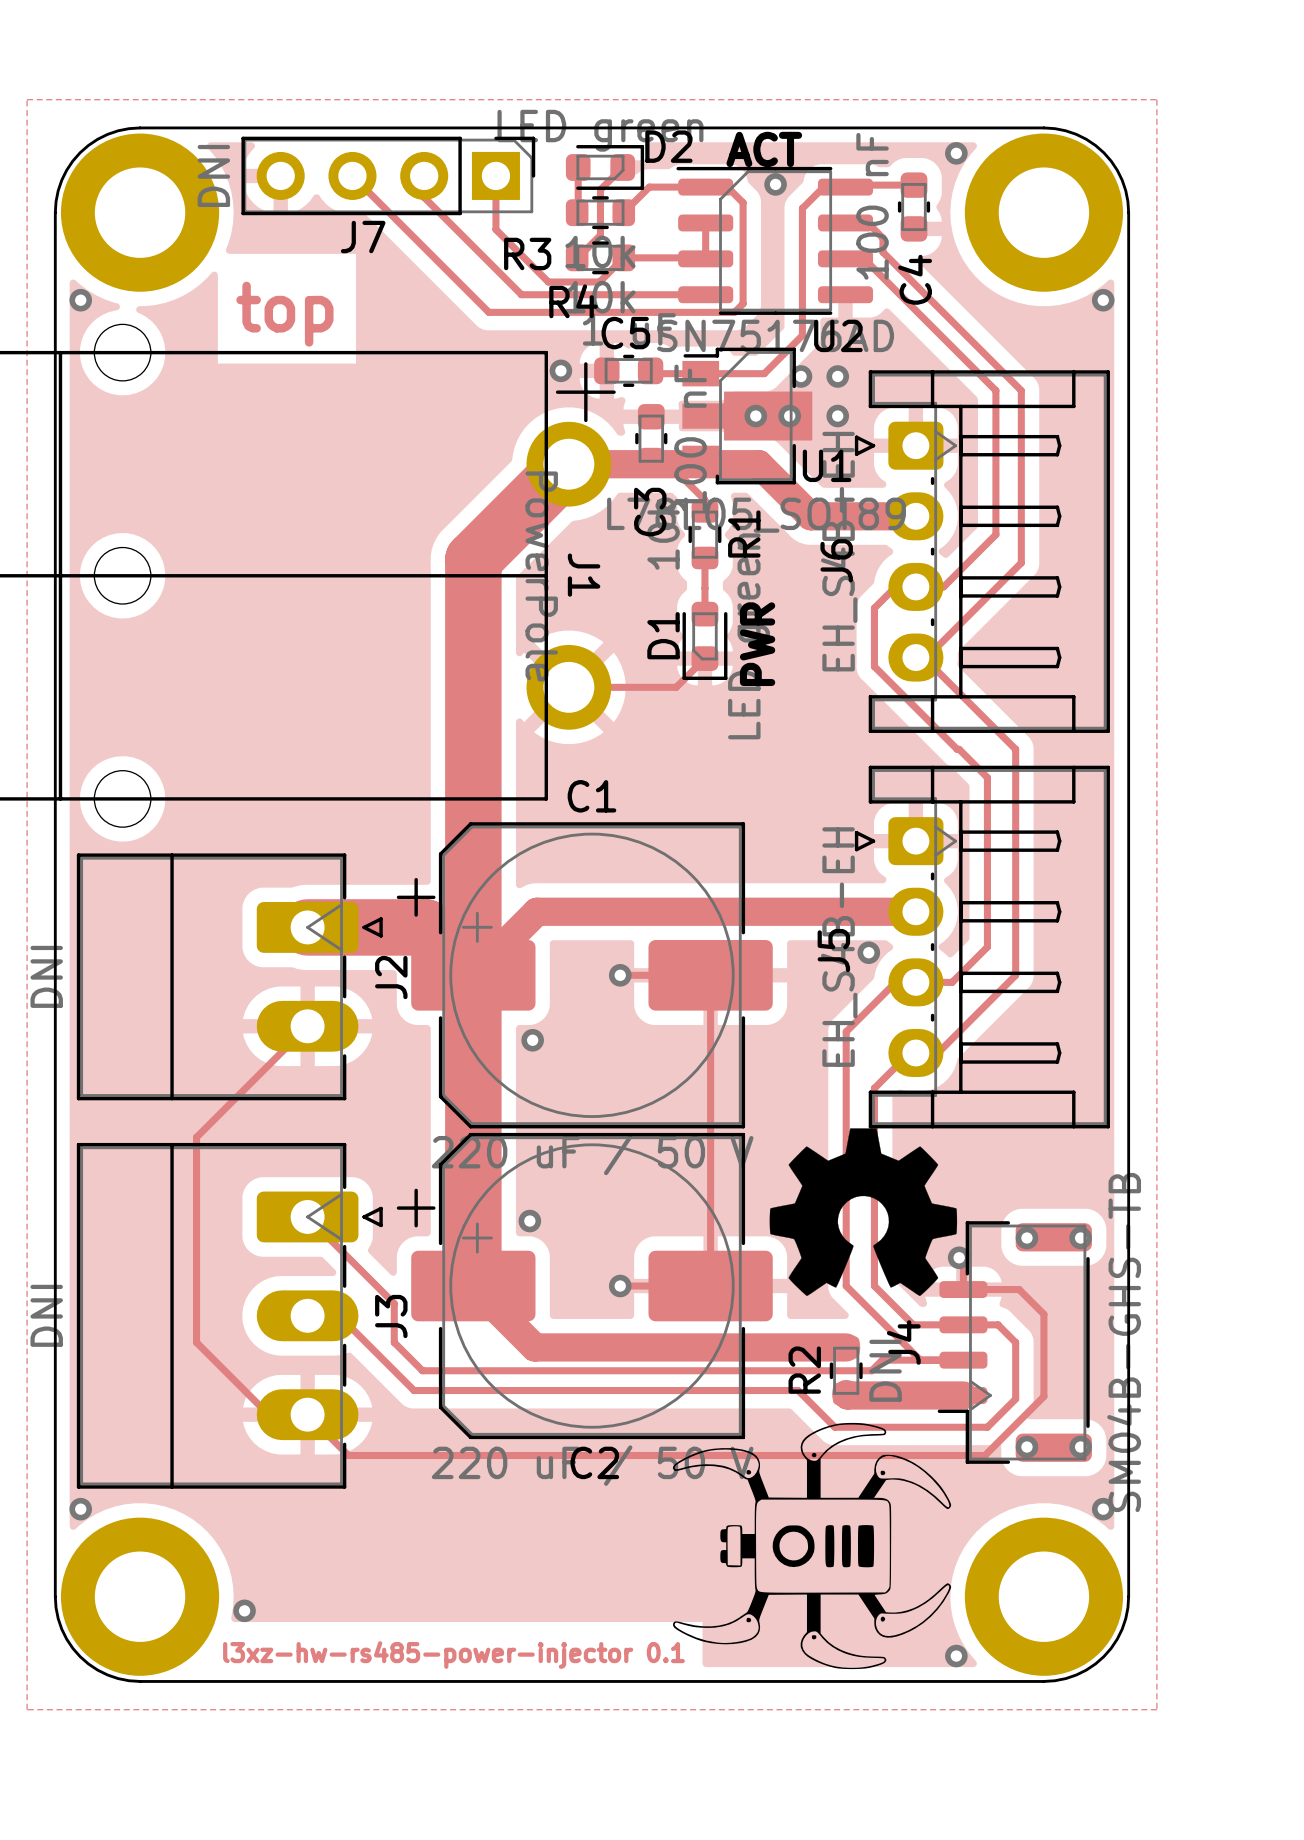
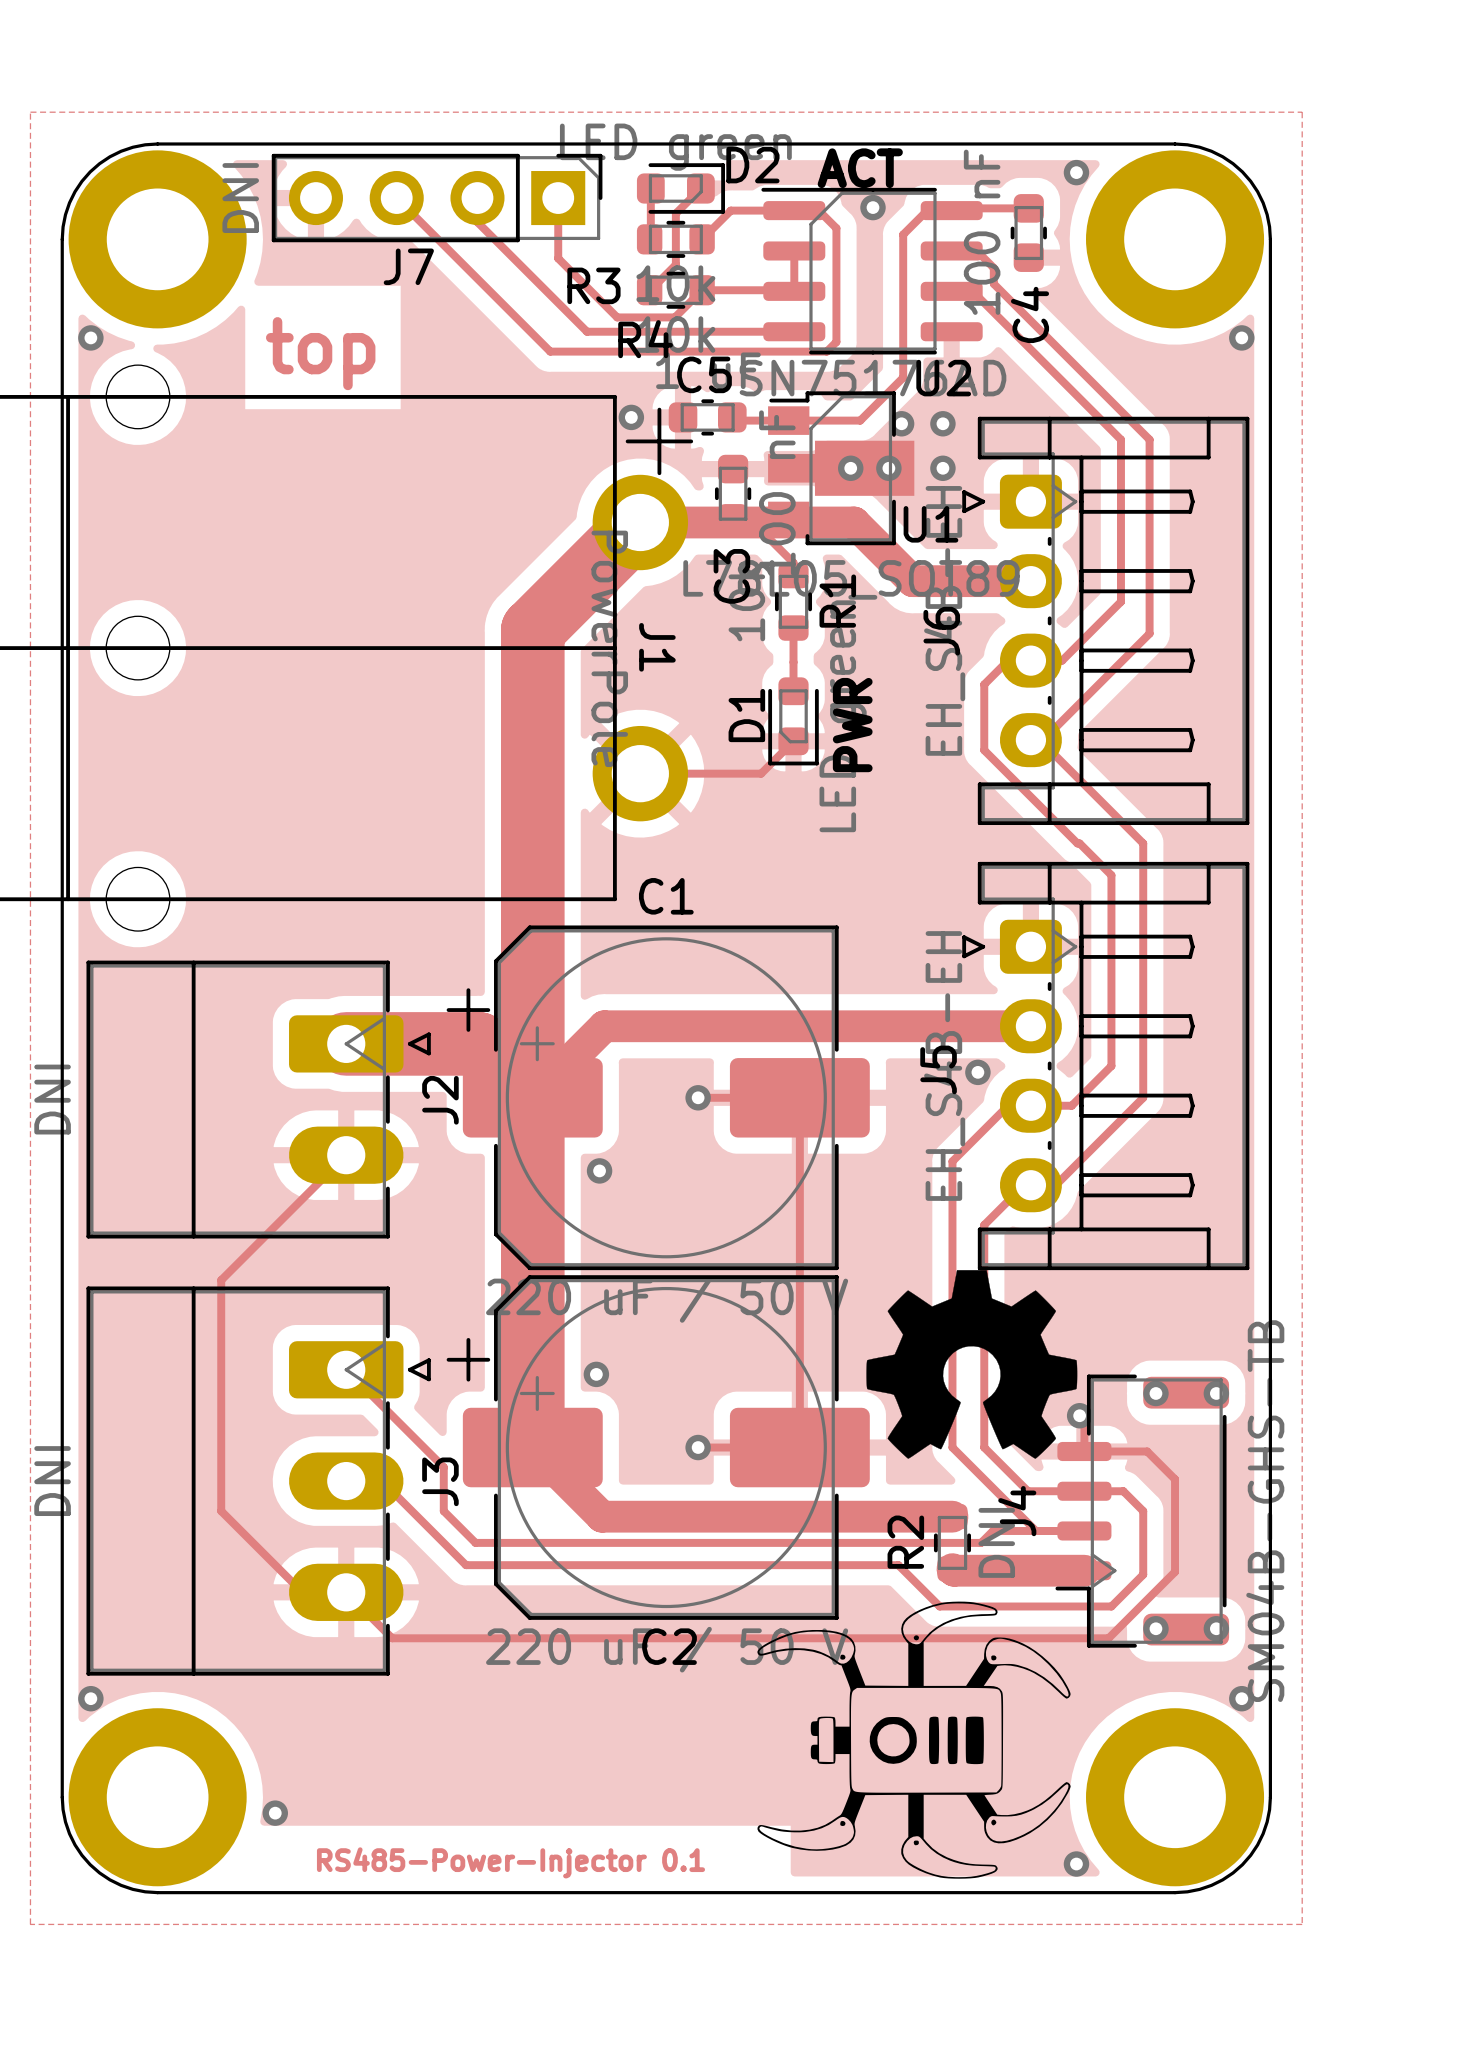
text: l3xz-hw-rs485-power-injector 0.1 (453, 1655) -> RS485-Power-Injector 0.1 (511, 1862)

